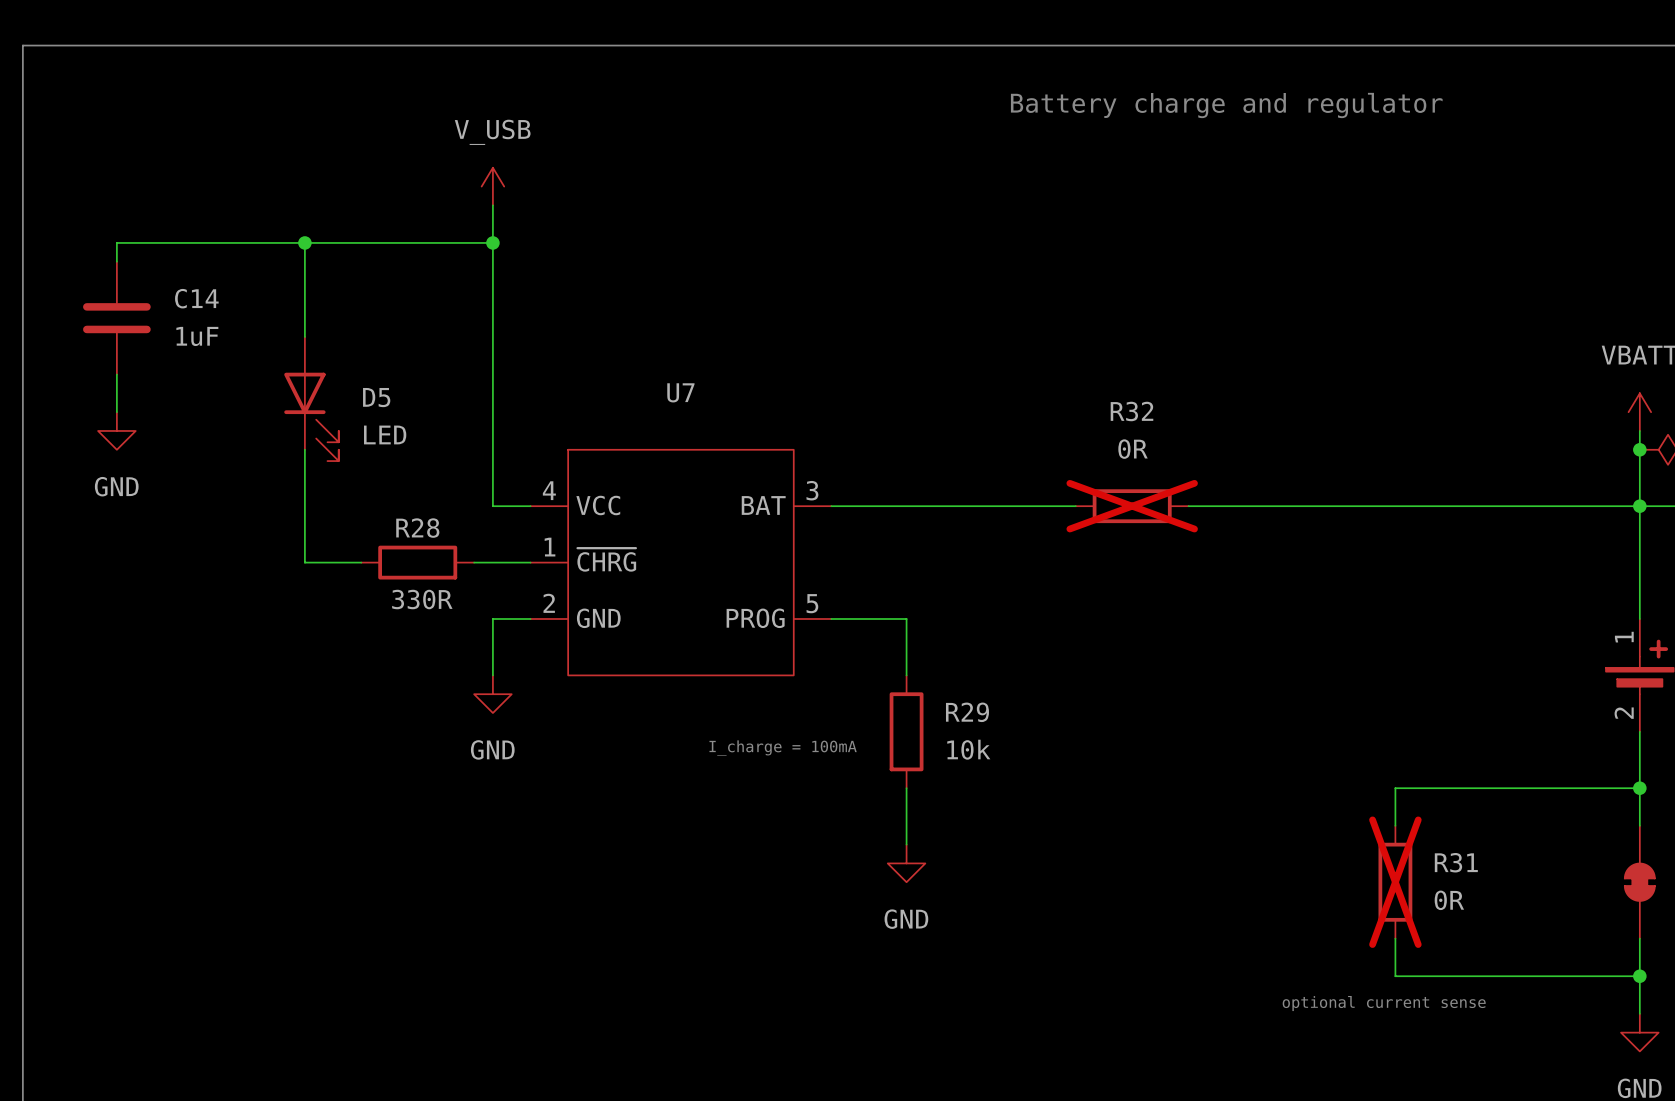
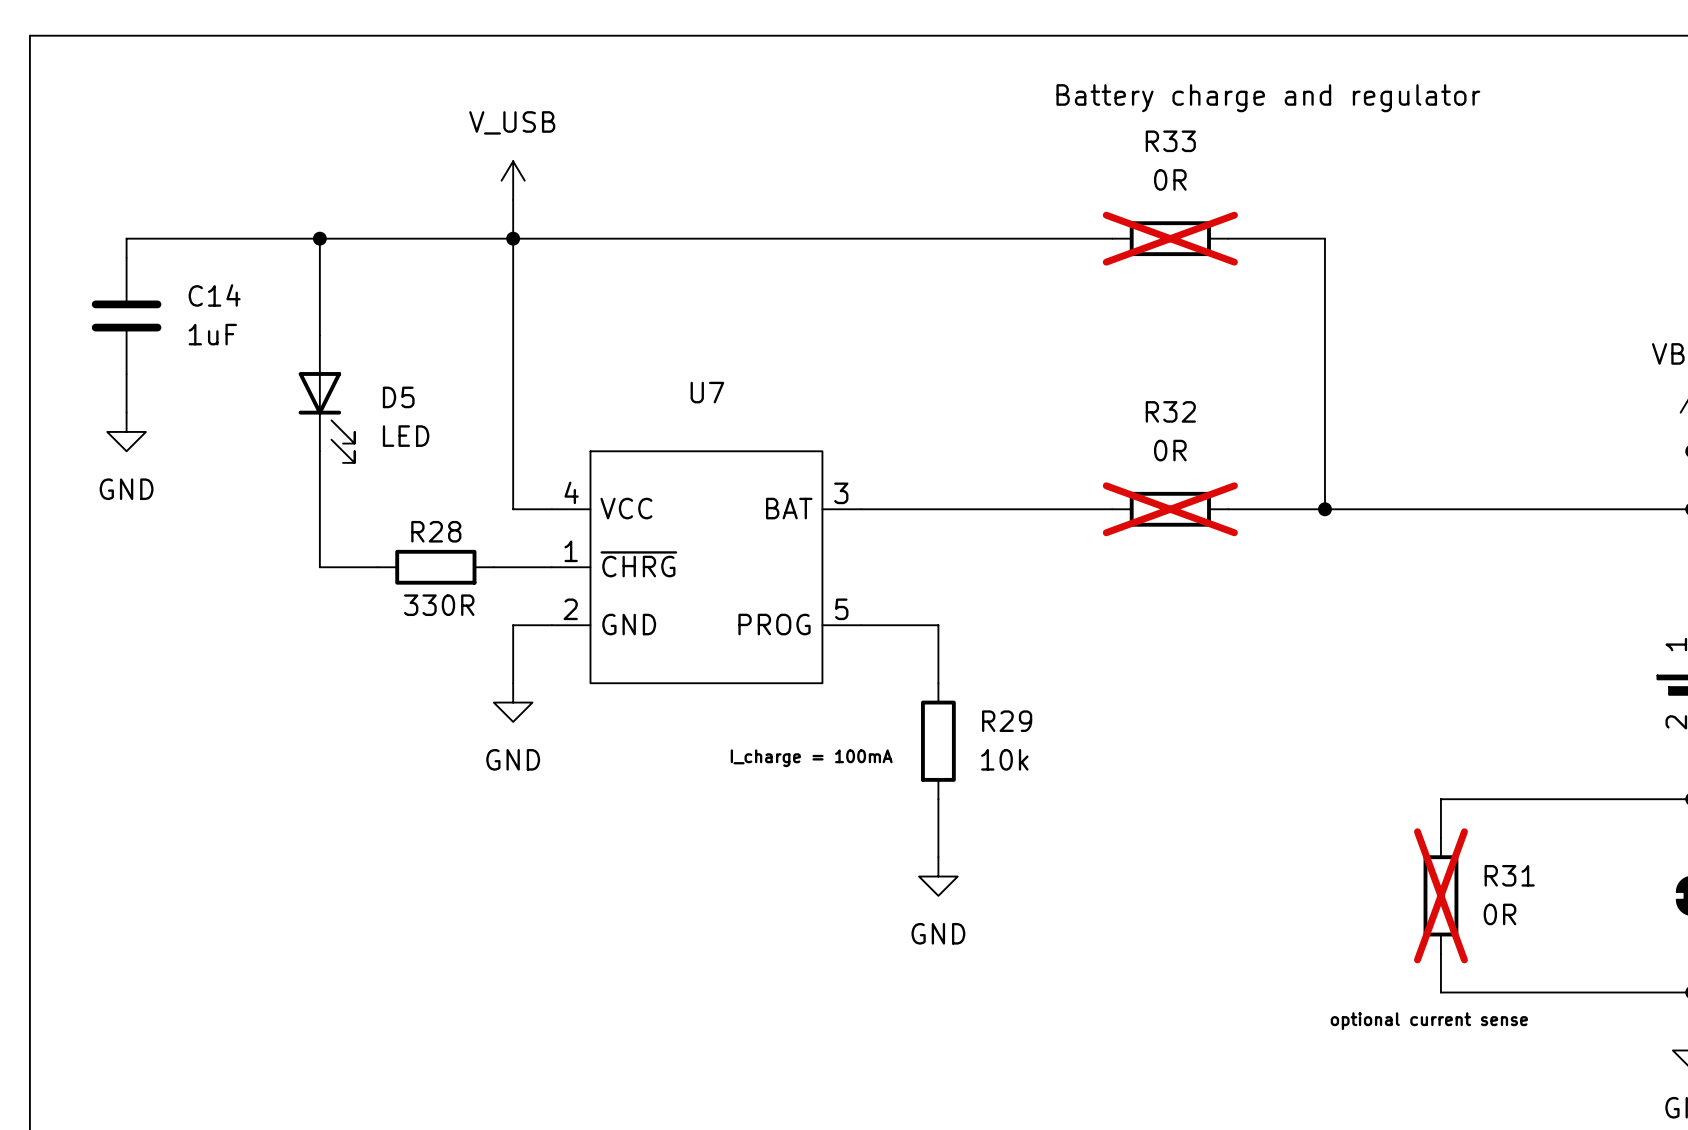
wire: none -> (513, 238) (1112, 238)
R33: none -> 0R (1170, 238)
wire: none -> (1228, 238) (1324, 238) (1324, 509)
junction: none -> (1324, 509)

